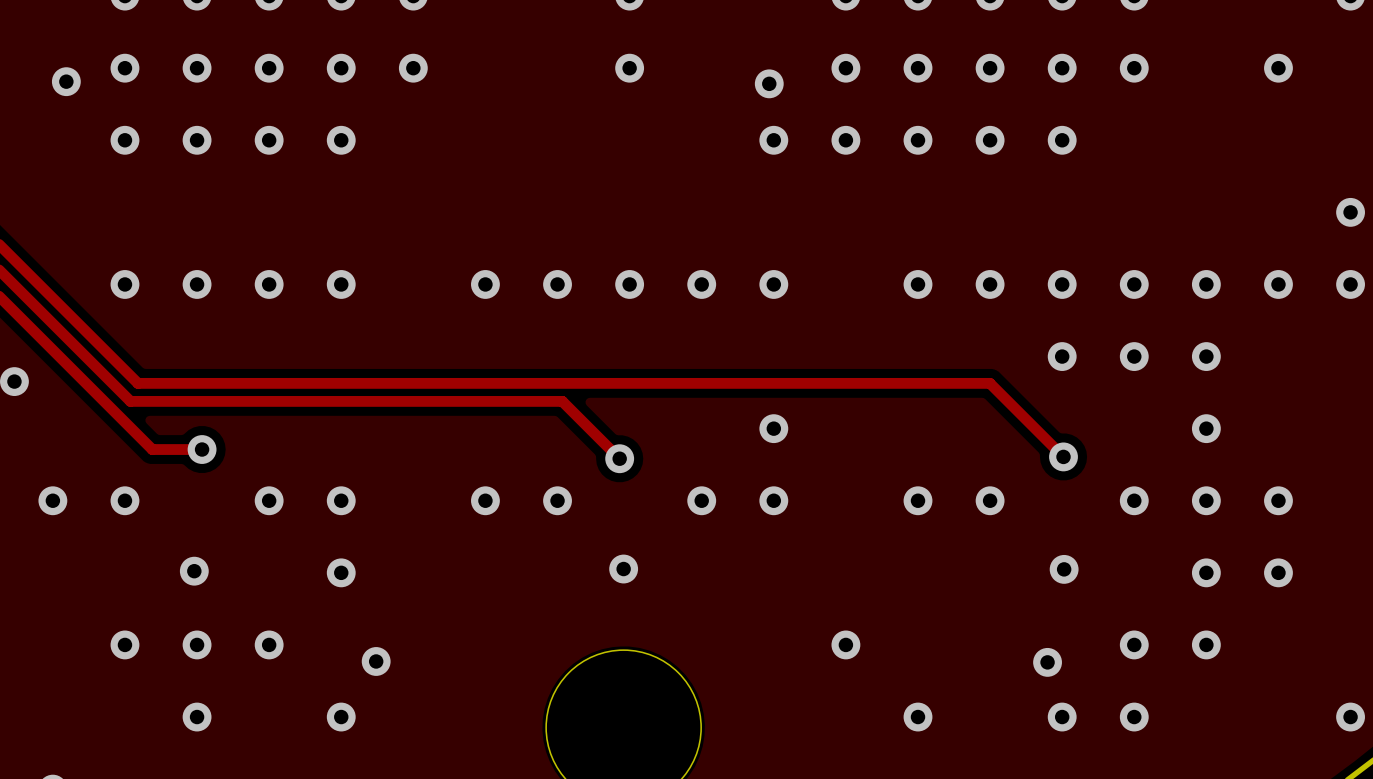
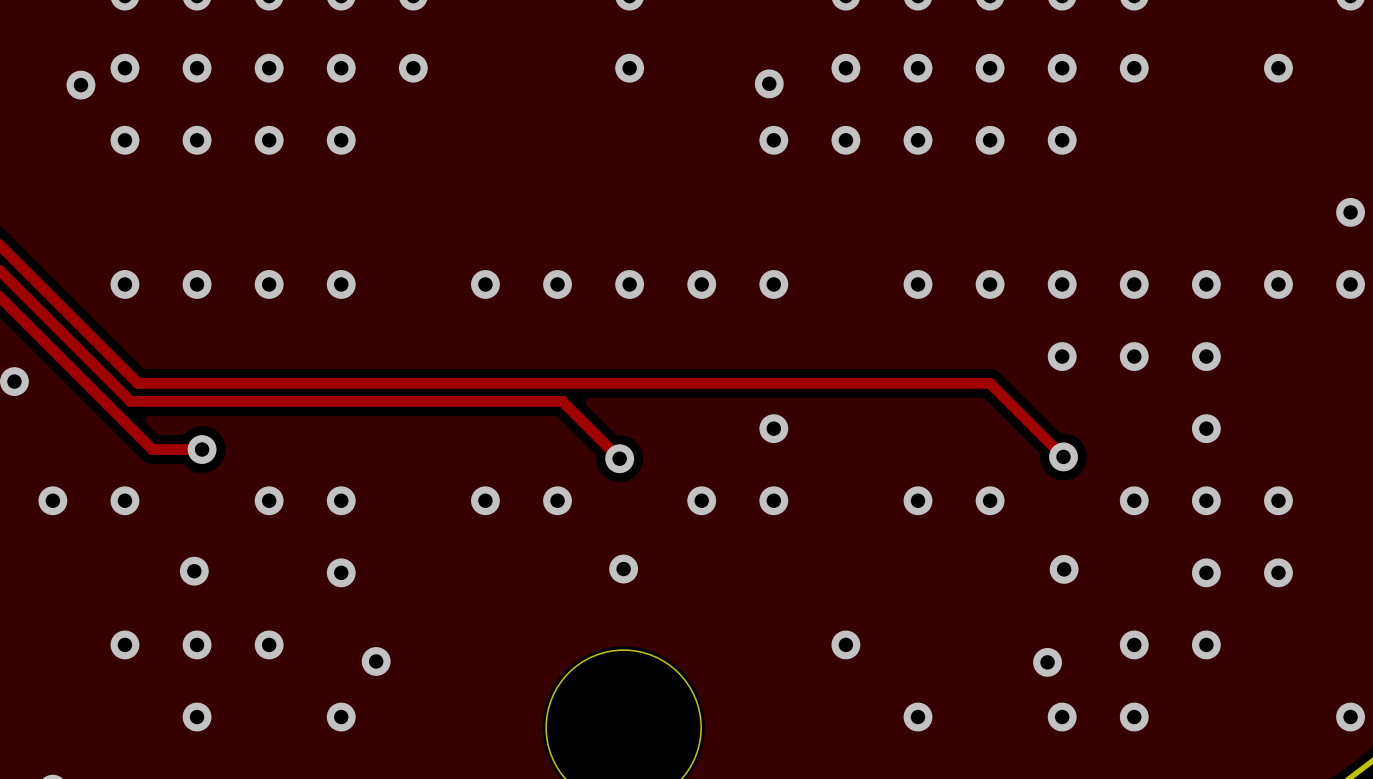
via position: (66, 81) -> (80, 85)

